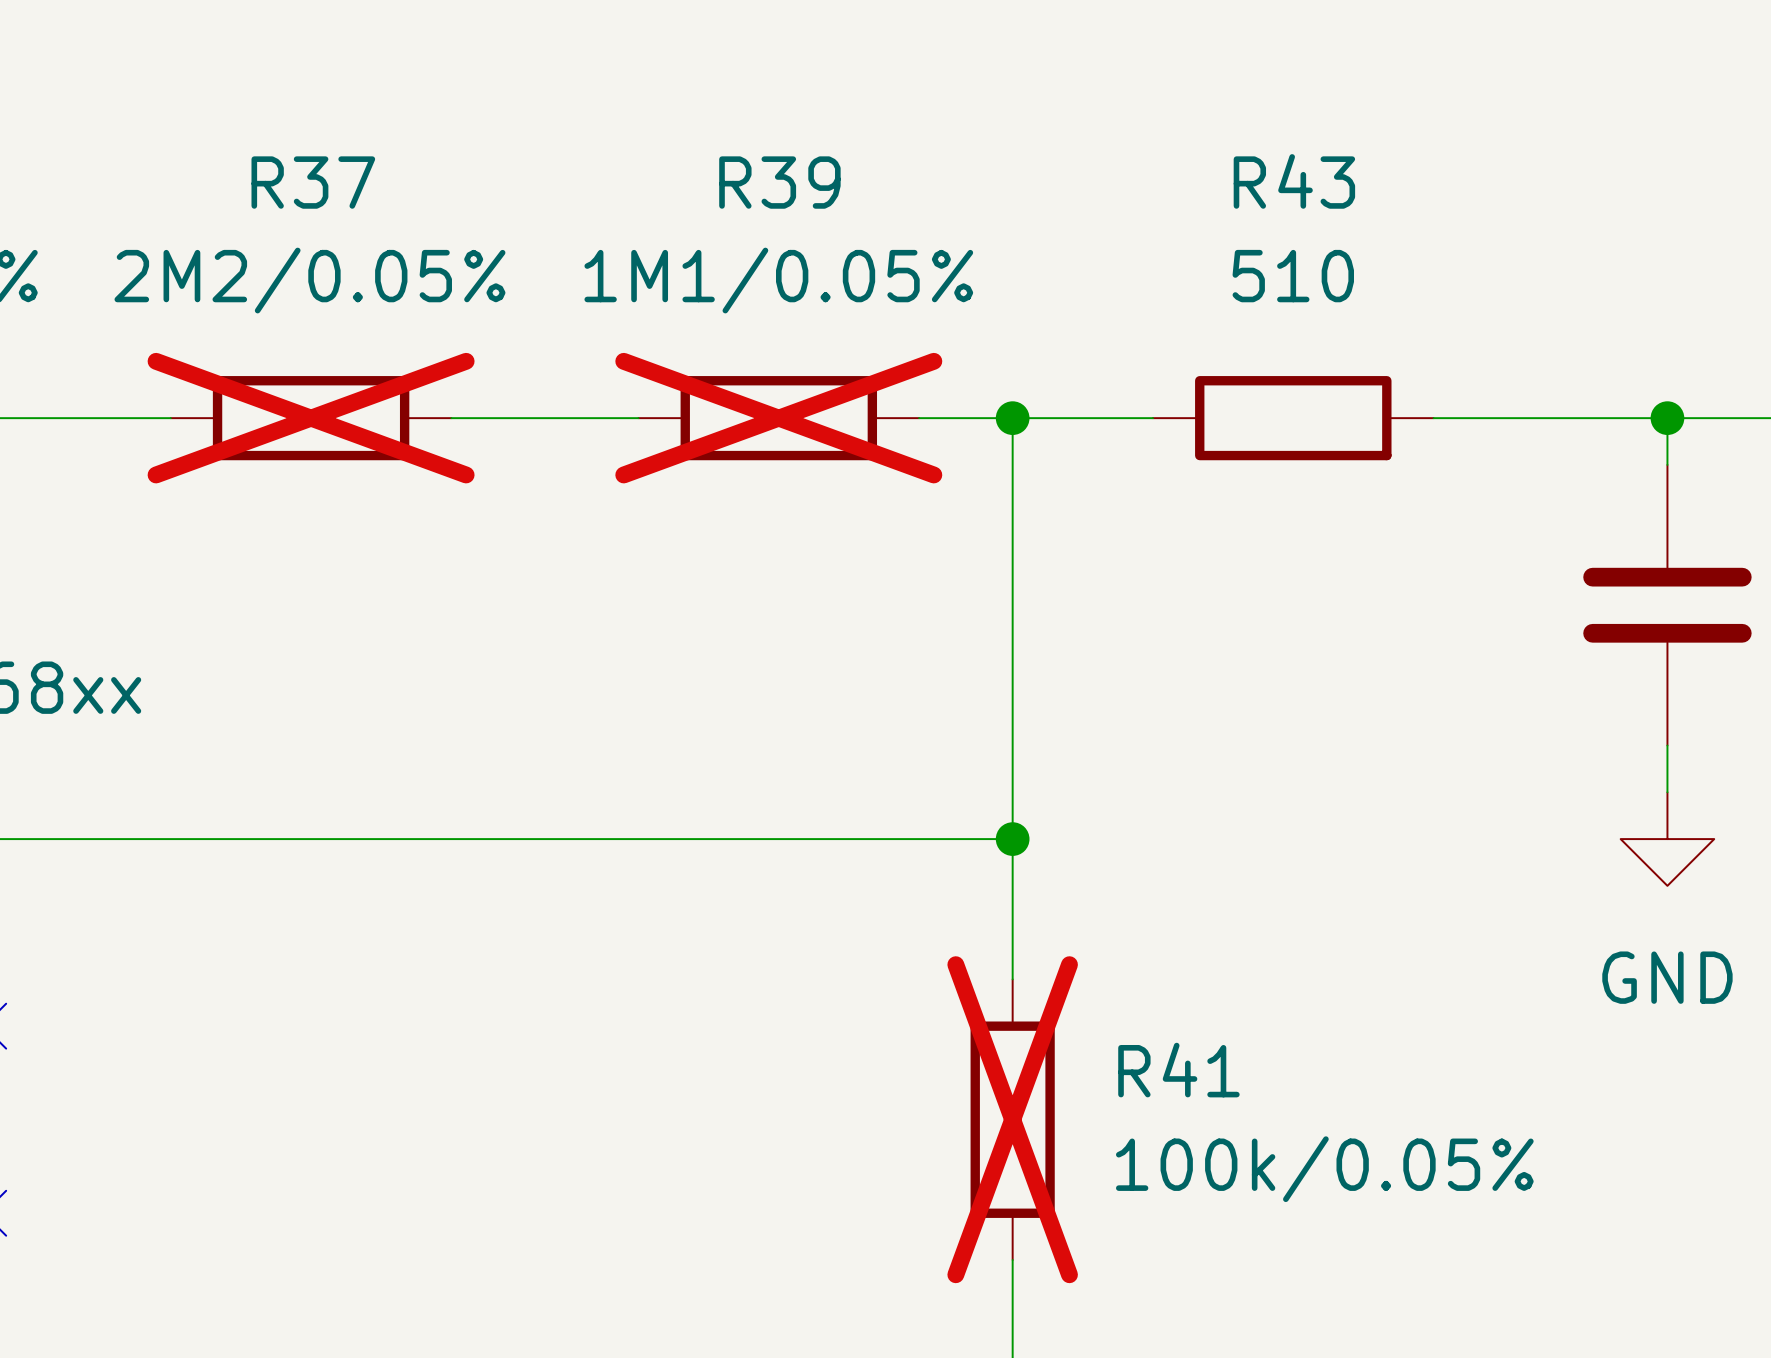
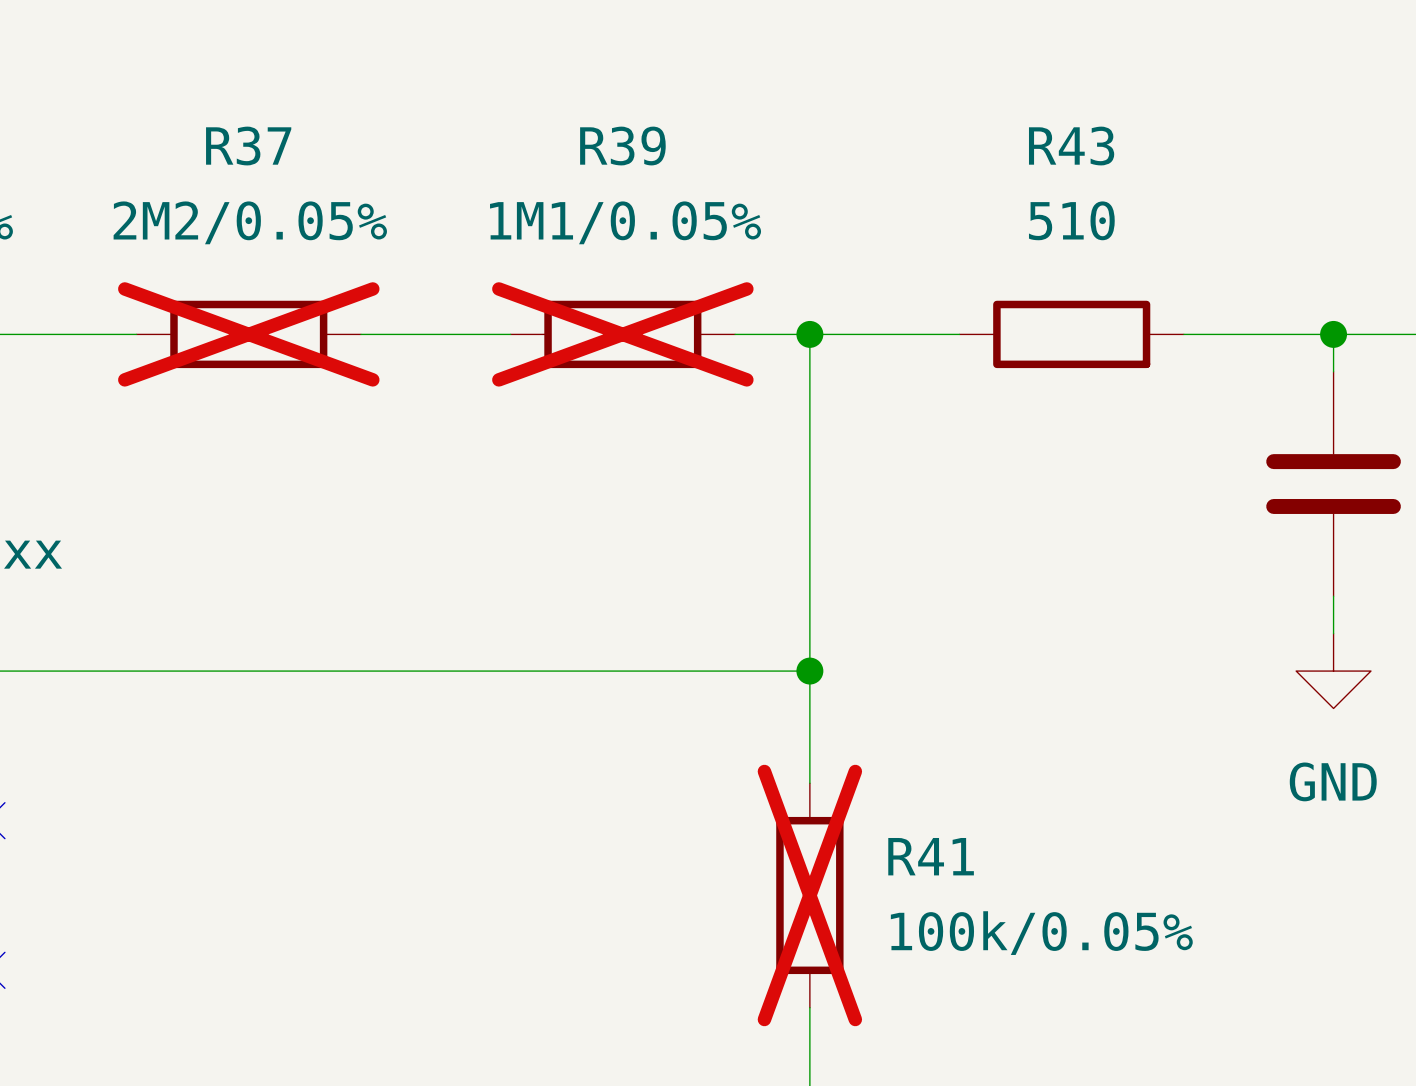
R43 position: (1293, 418) -> (1071, 334)

